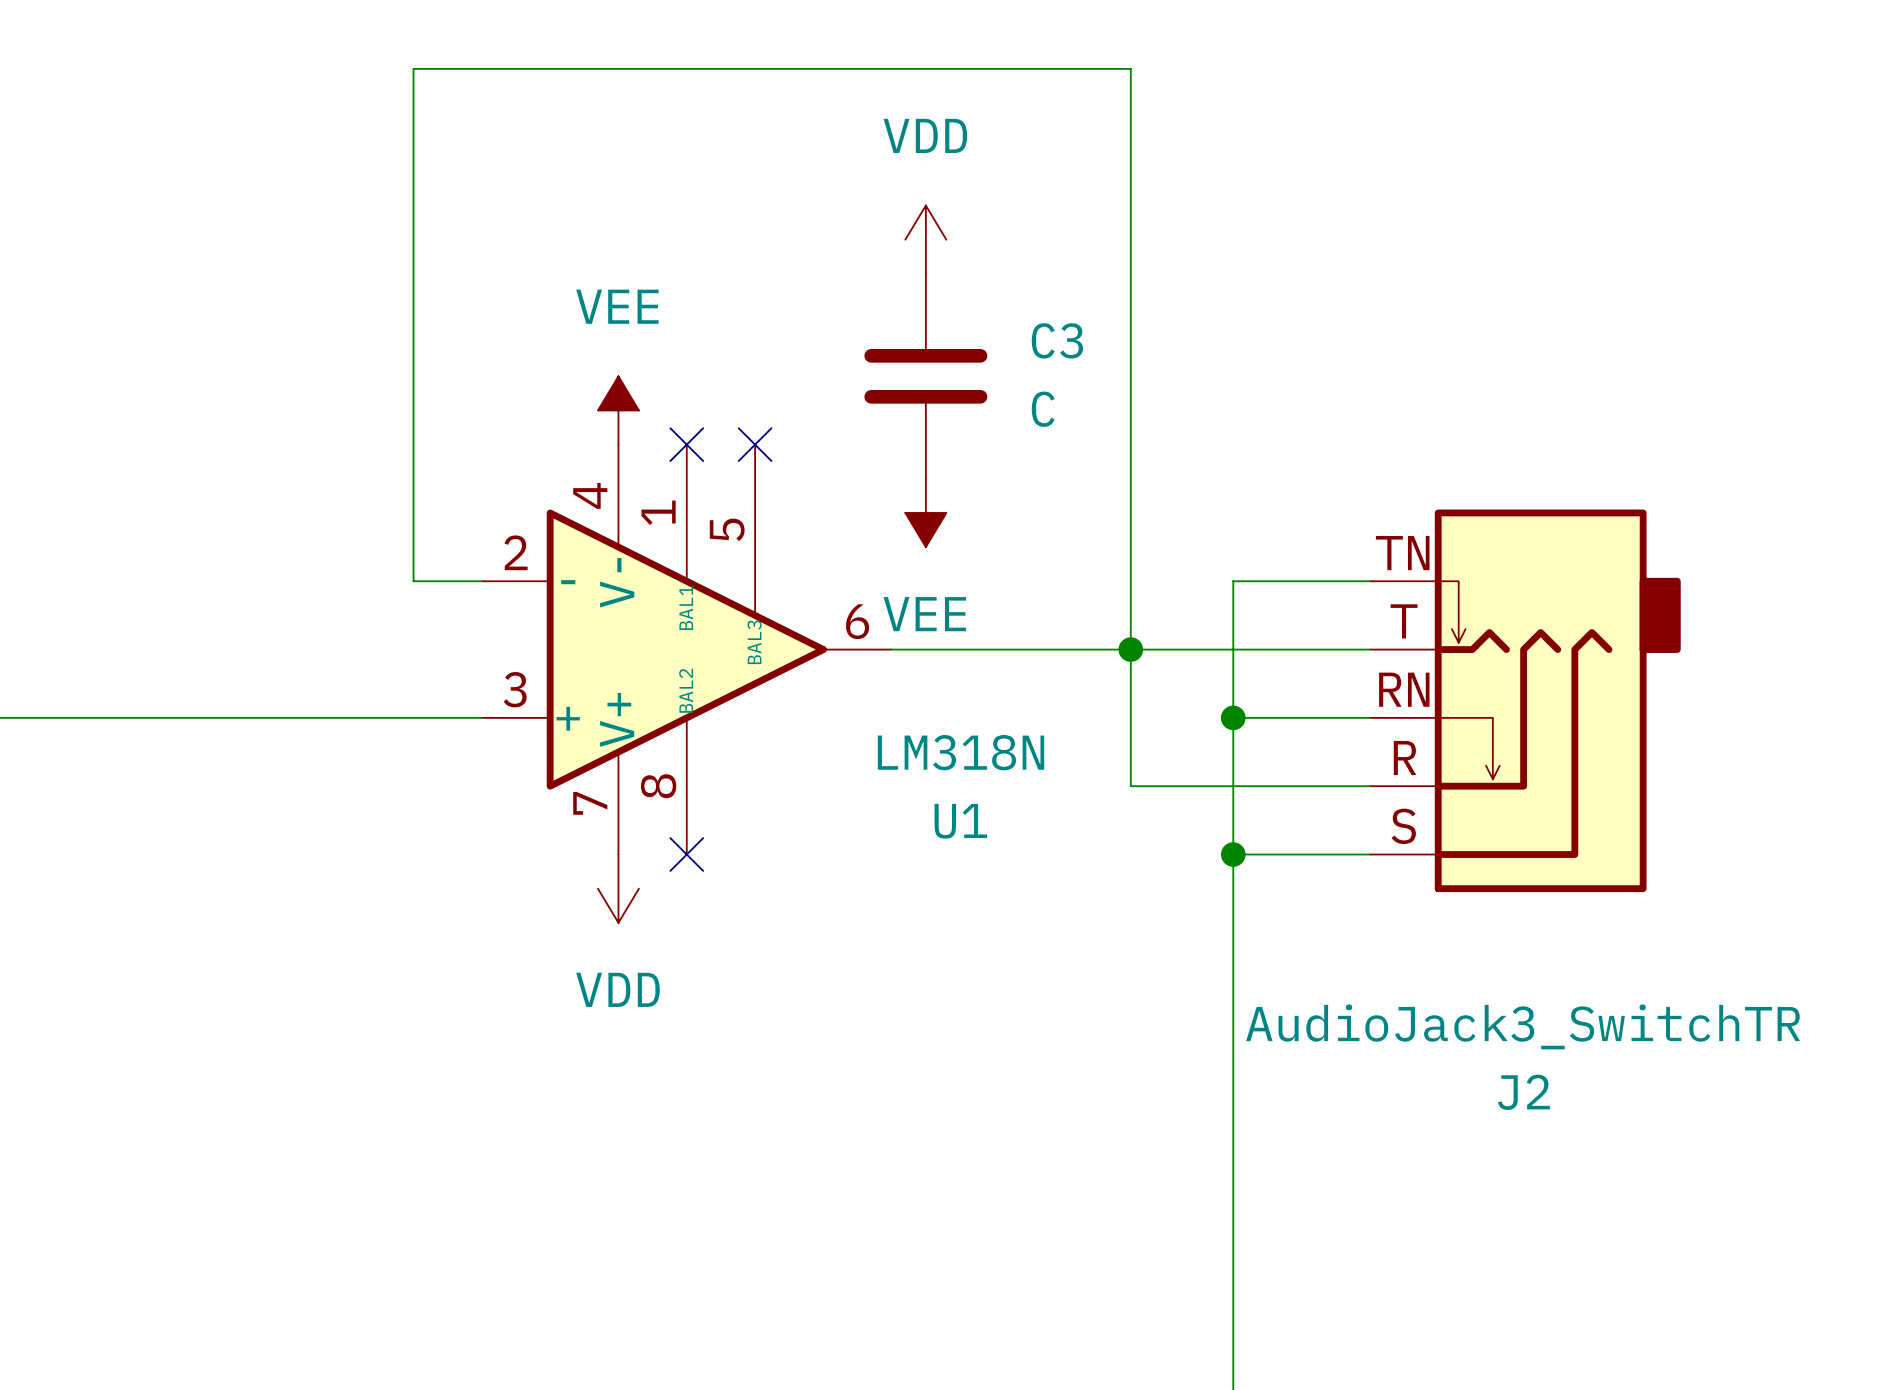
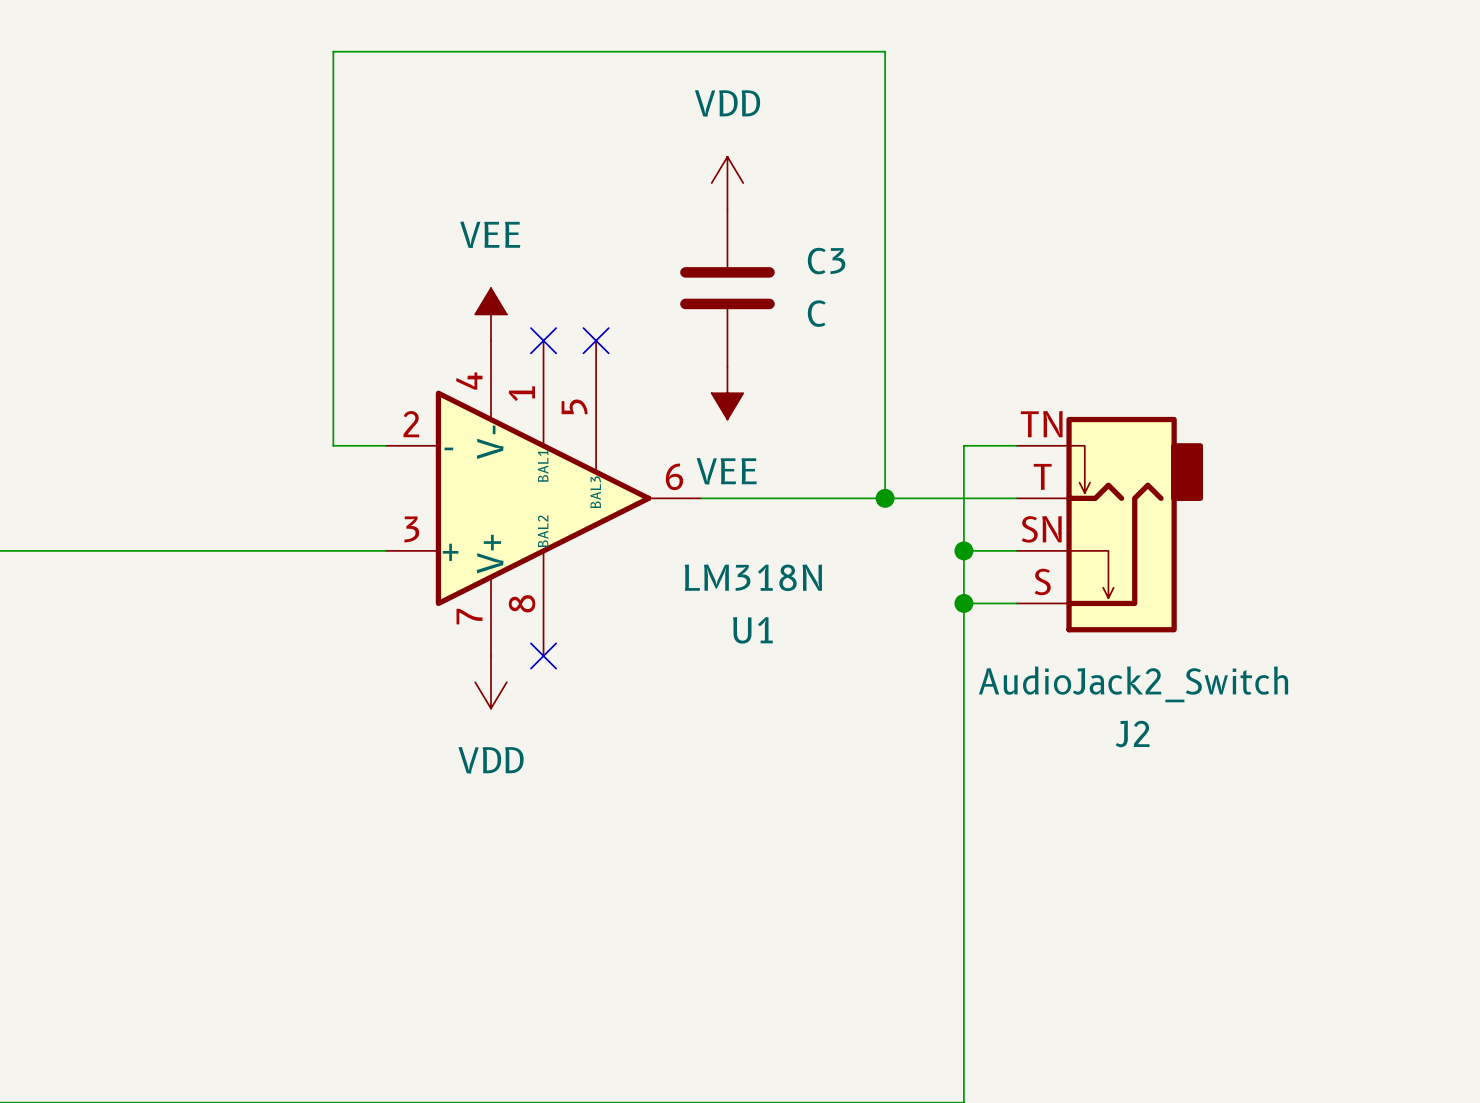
J2 symbol: [1369, 509, 1681, 893] -> [1016, 416, 1204, 633]
wire: (1130, 649) (1130, 786) (1233, 786) -> none
wire: (1233, 854) (1369, 854) -> none
junction position: (1233, 854) -> (963, 603)
J2 value: AudioJack3_SwitchTR (1523, 1026) -> AudioJack2_Switch (1133, 684)
J2 name position: J2 (1523, 1092) -> J2 (1132, 733)

